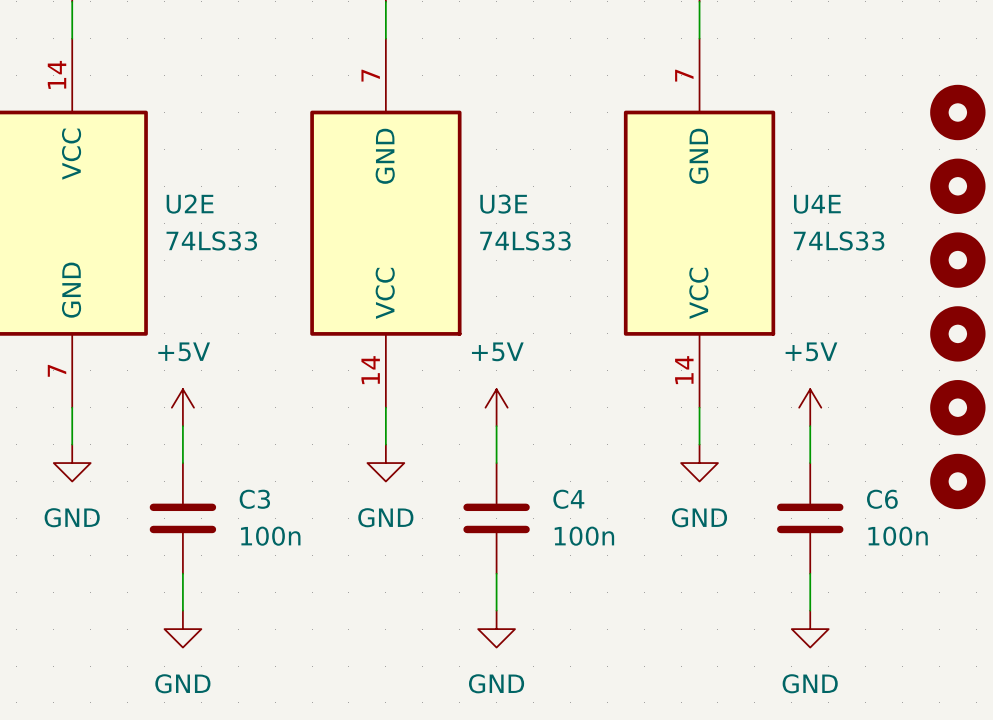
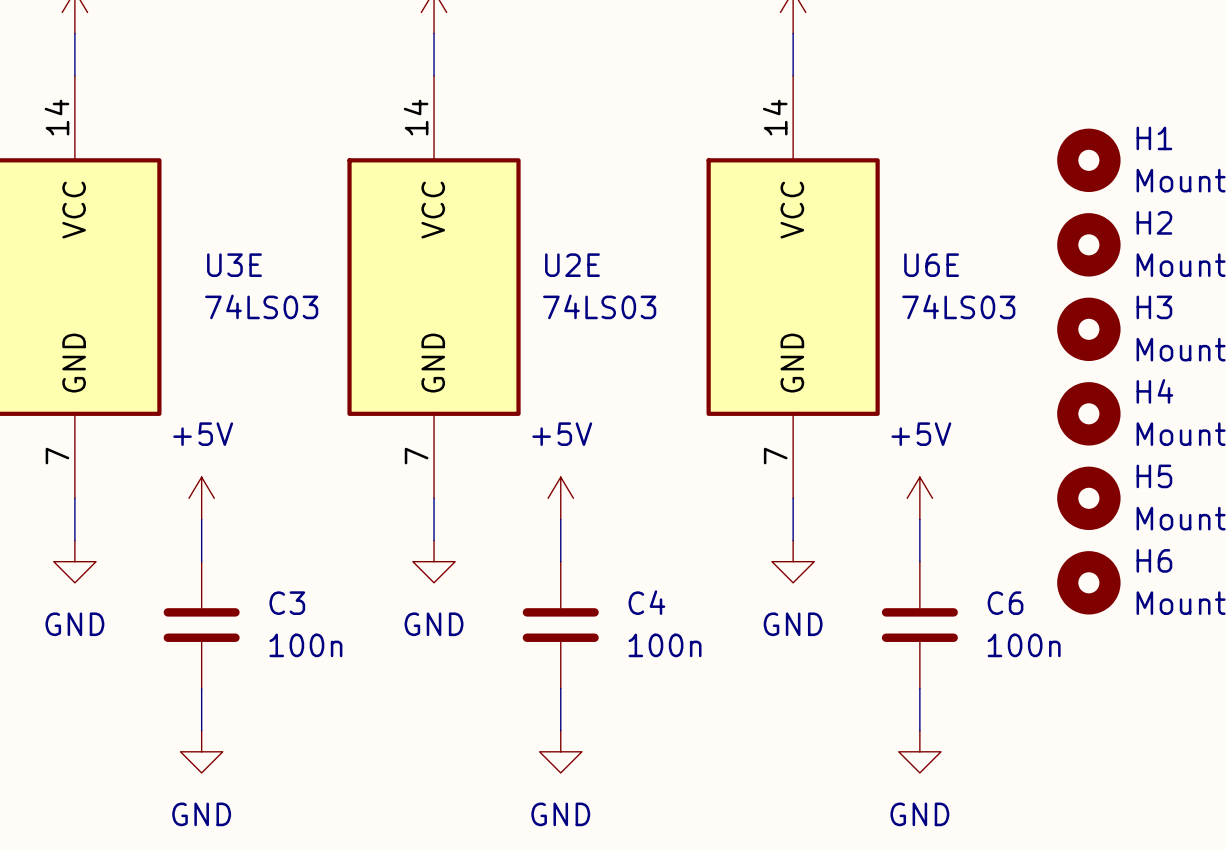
U2E name: U2E (190, 204) -> U3E (234, 265)
U3E name: U3E (503, 204) -> U2E (572, 265)
U4E name: U4E (817, 204) -> U6E (931, 265)
U3E rotation: 0° (385, 223) -> 180° (434, 287)
U4E rotation: 0° (699, 223) -> 180° (793, 287)
U2E value: 74LS33 (211, 240) -> 74LS03 (261, 306)
U3E value: 74LS33 (525, 240) -> 74LS03 (599, 306)
U4E value: 74LS33 (839, 240) -> 74LS03 (958, 306)

